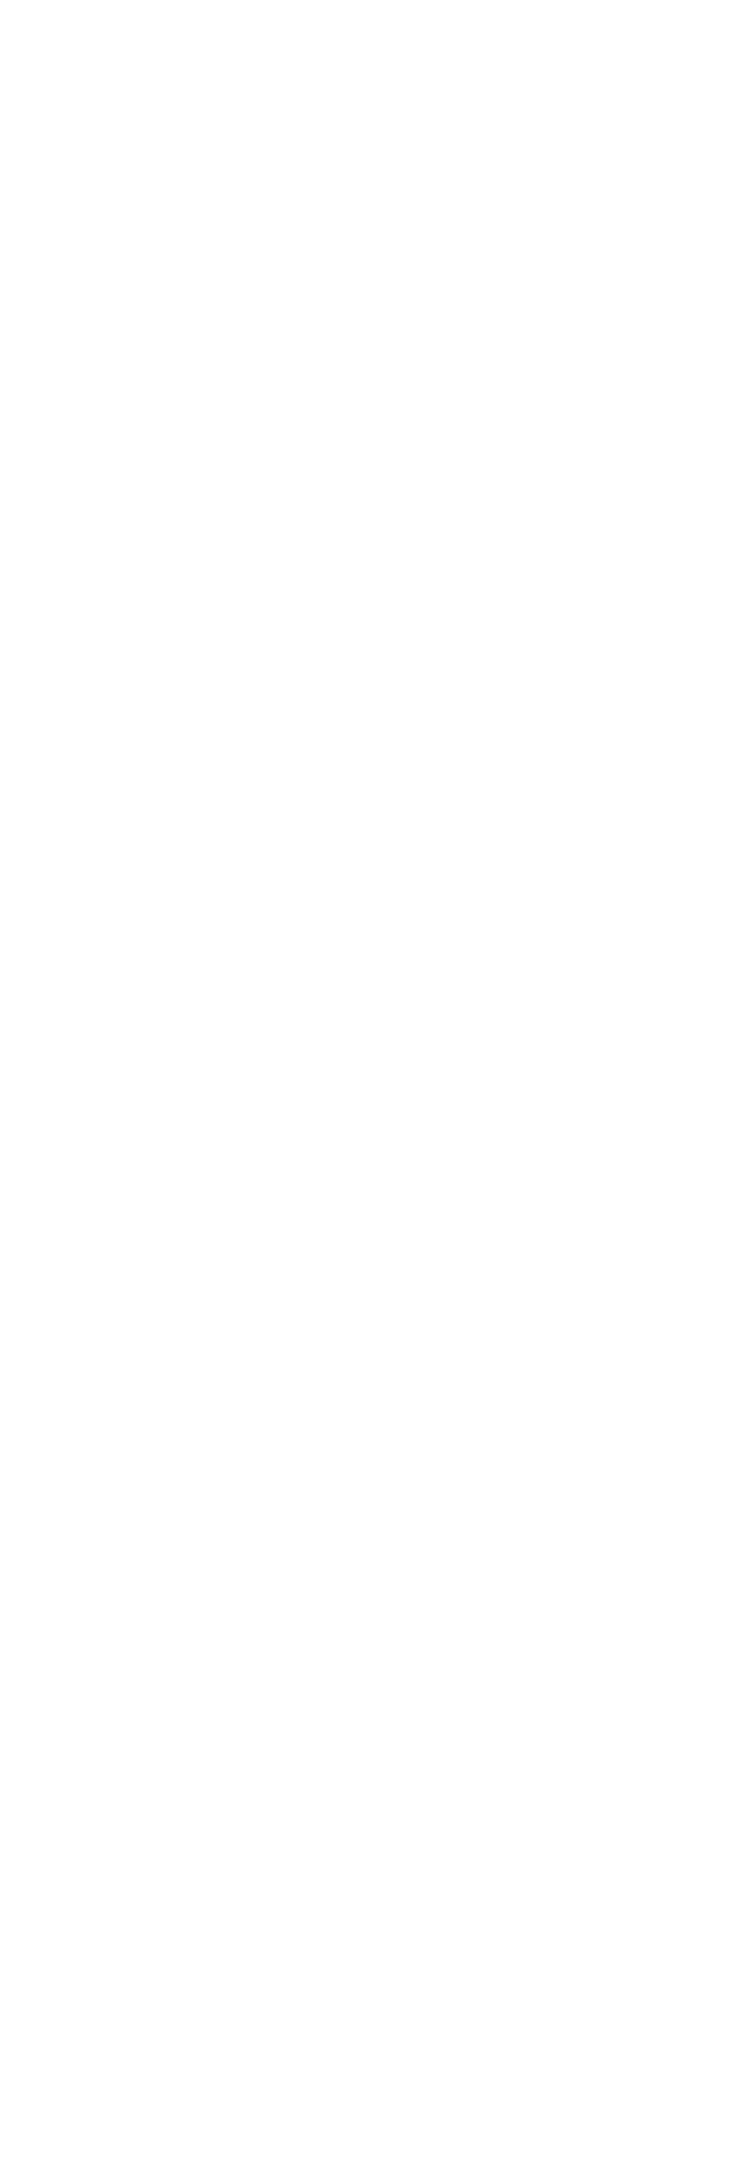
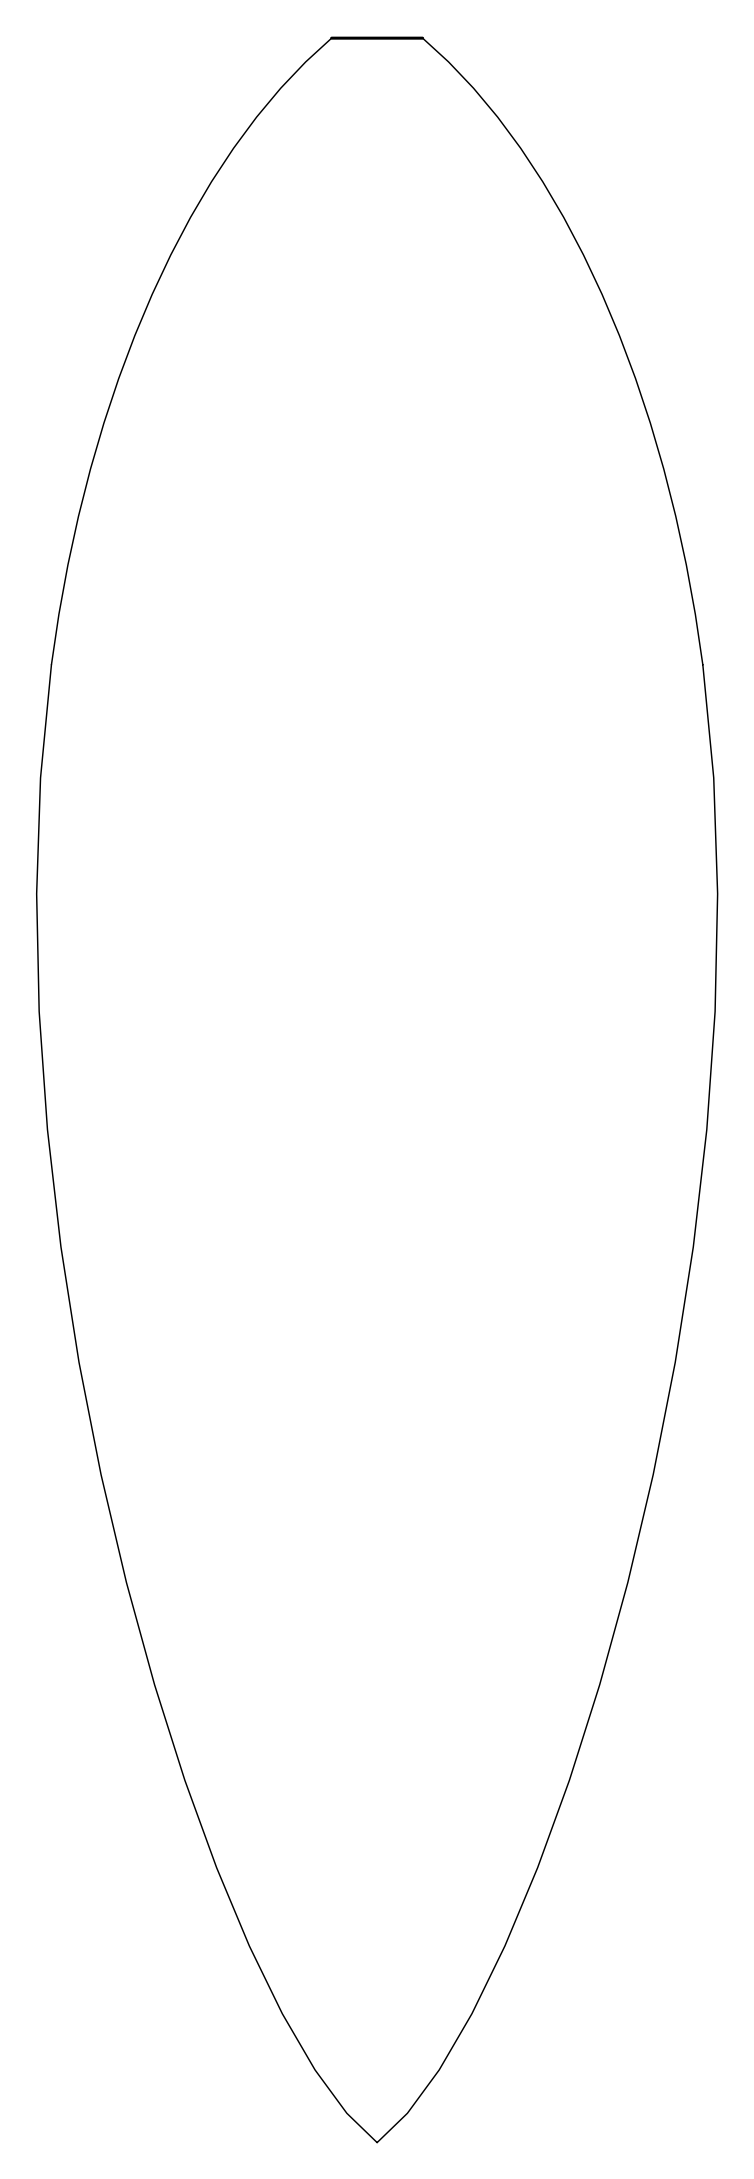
board edge: none -> (331, 38) (422, 38) (448, 61) (473, 88) (520, 148) (563, 217) (602, 294) (635, 378) (650, 423) (675, 516) (686, 564) (702, 664) (713, 777) (717, 893) (715, 1011) (706, 1129) (693, 1247) (675, 1362) (653, 1474) (627, 1582) (599, 1684) (569, 1780) (537, 1867) (504, 1945) (471, 2013) (439, 2069) (407, 2113) (377, 2142) (346, 2113) (315, 2069) (282, 2013) (249, 1945) (216, 1867) (184, 1780) (154, 1684) (126, 1582) (101, 1474) (79, 1362) (60, 1247) (47, 1129) (39, 1011) (36, 893) (40, 777) (51, 664) (67, 564) (78, 516) (103, 423) (118, 378) (152, 294) (190, 217) (211, 181) (256, 117) (280, 88) (331, 38)

